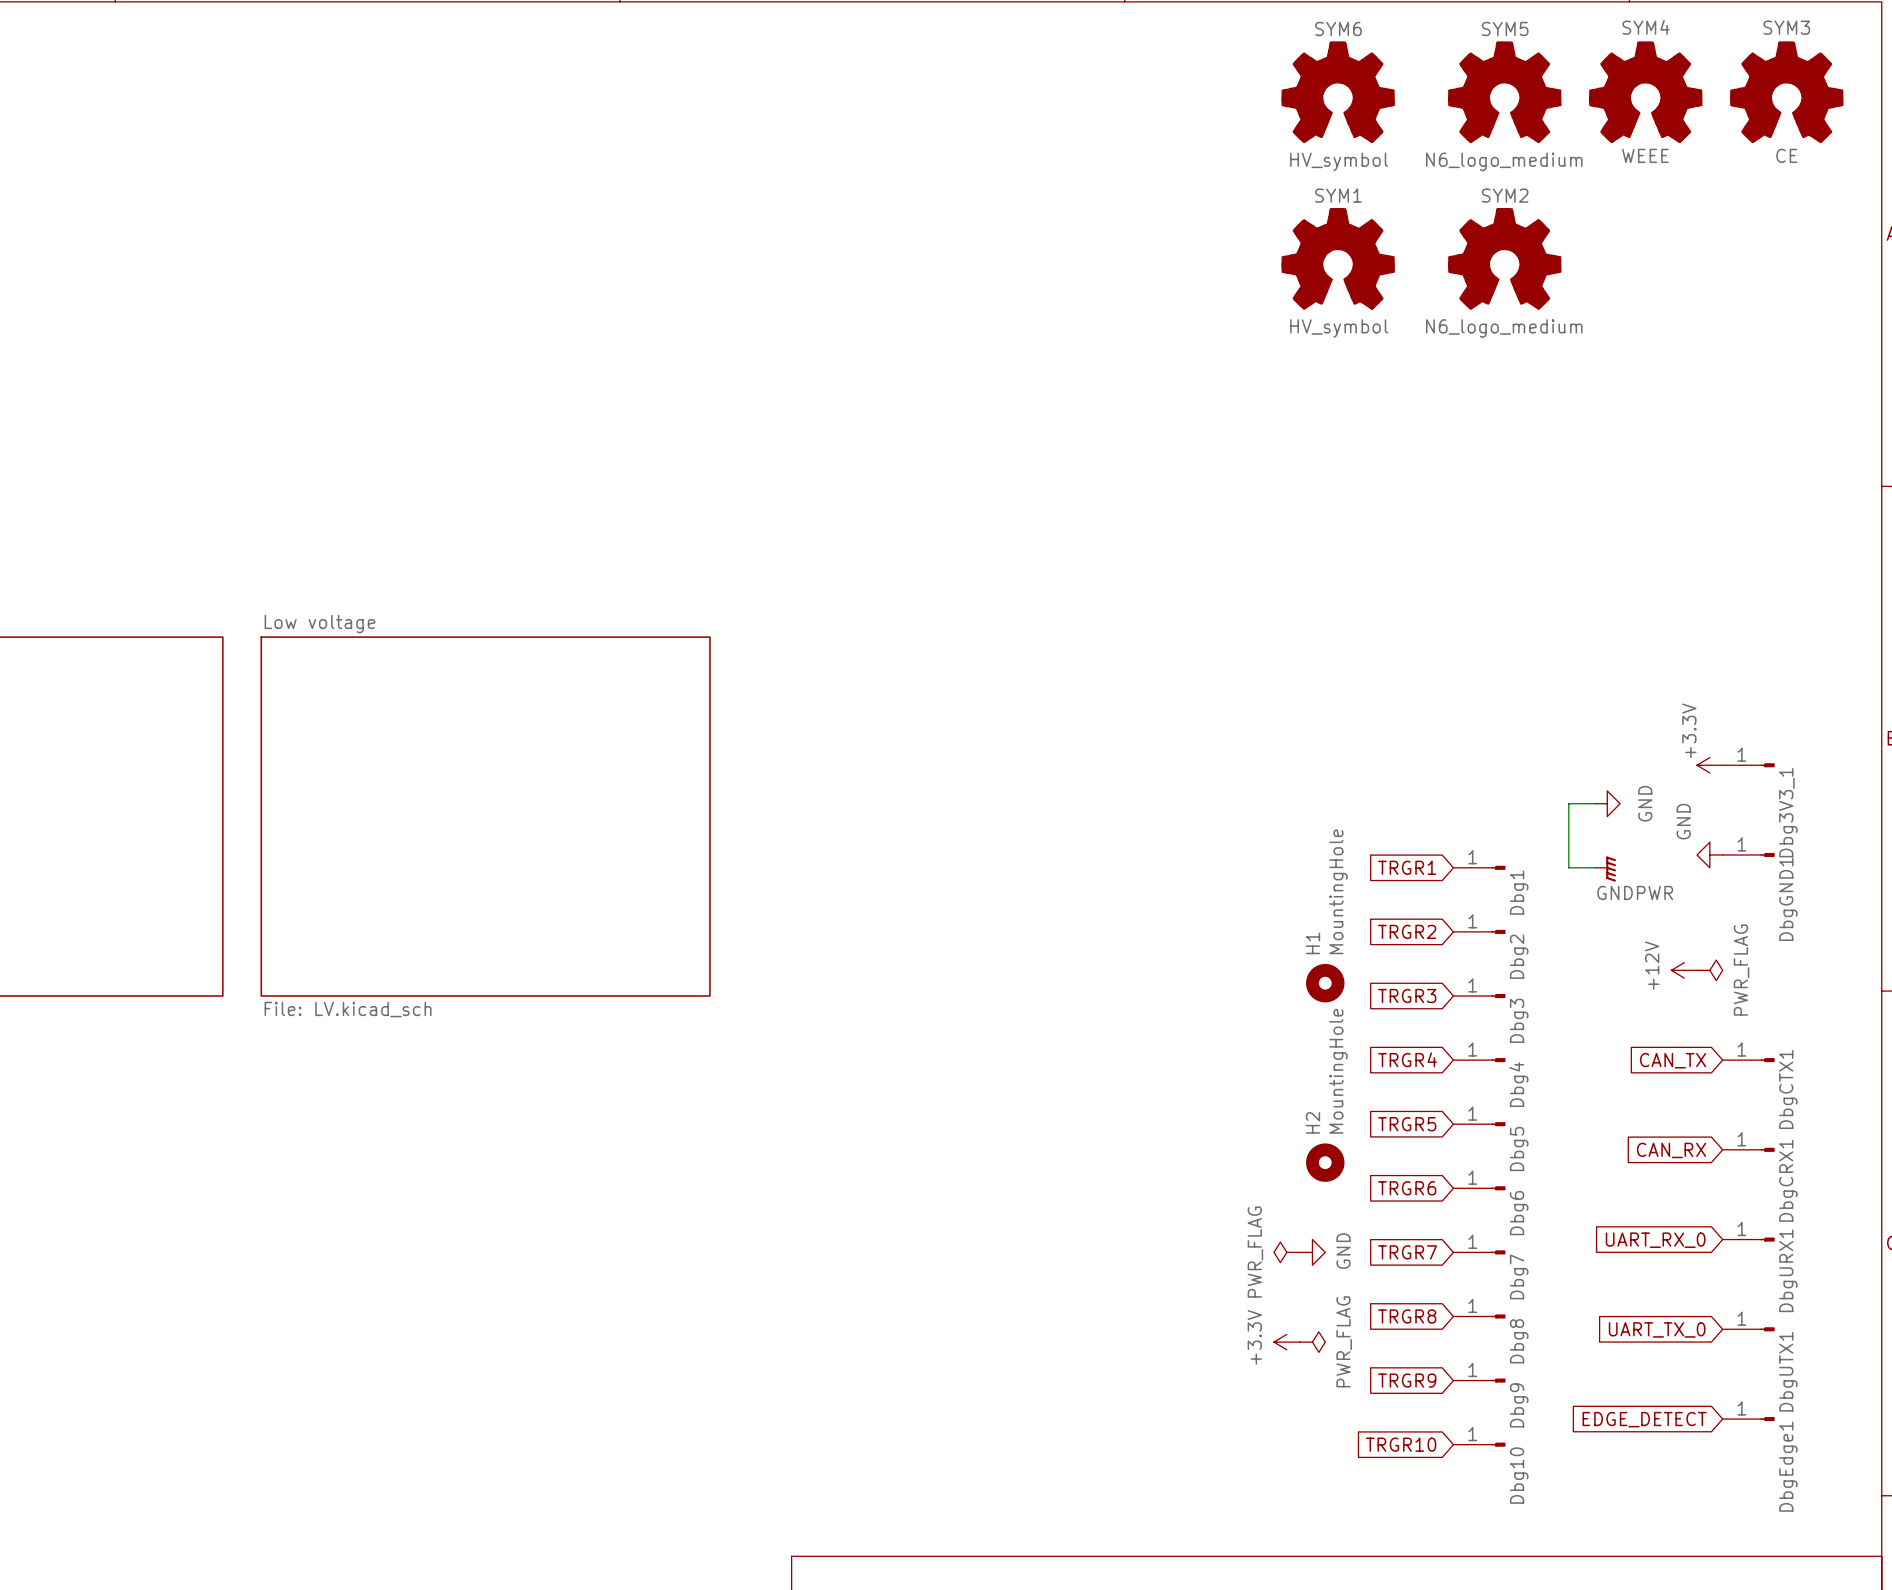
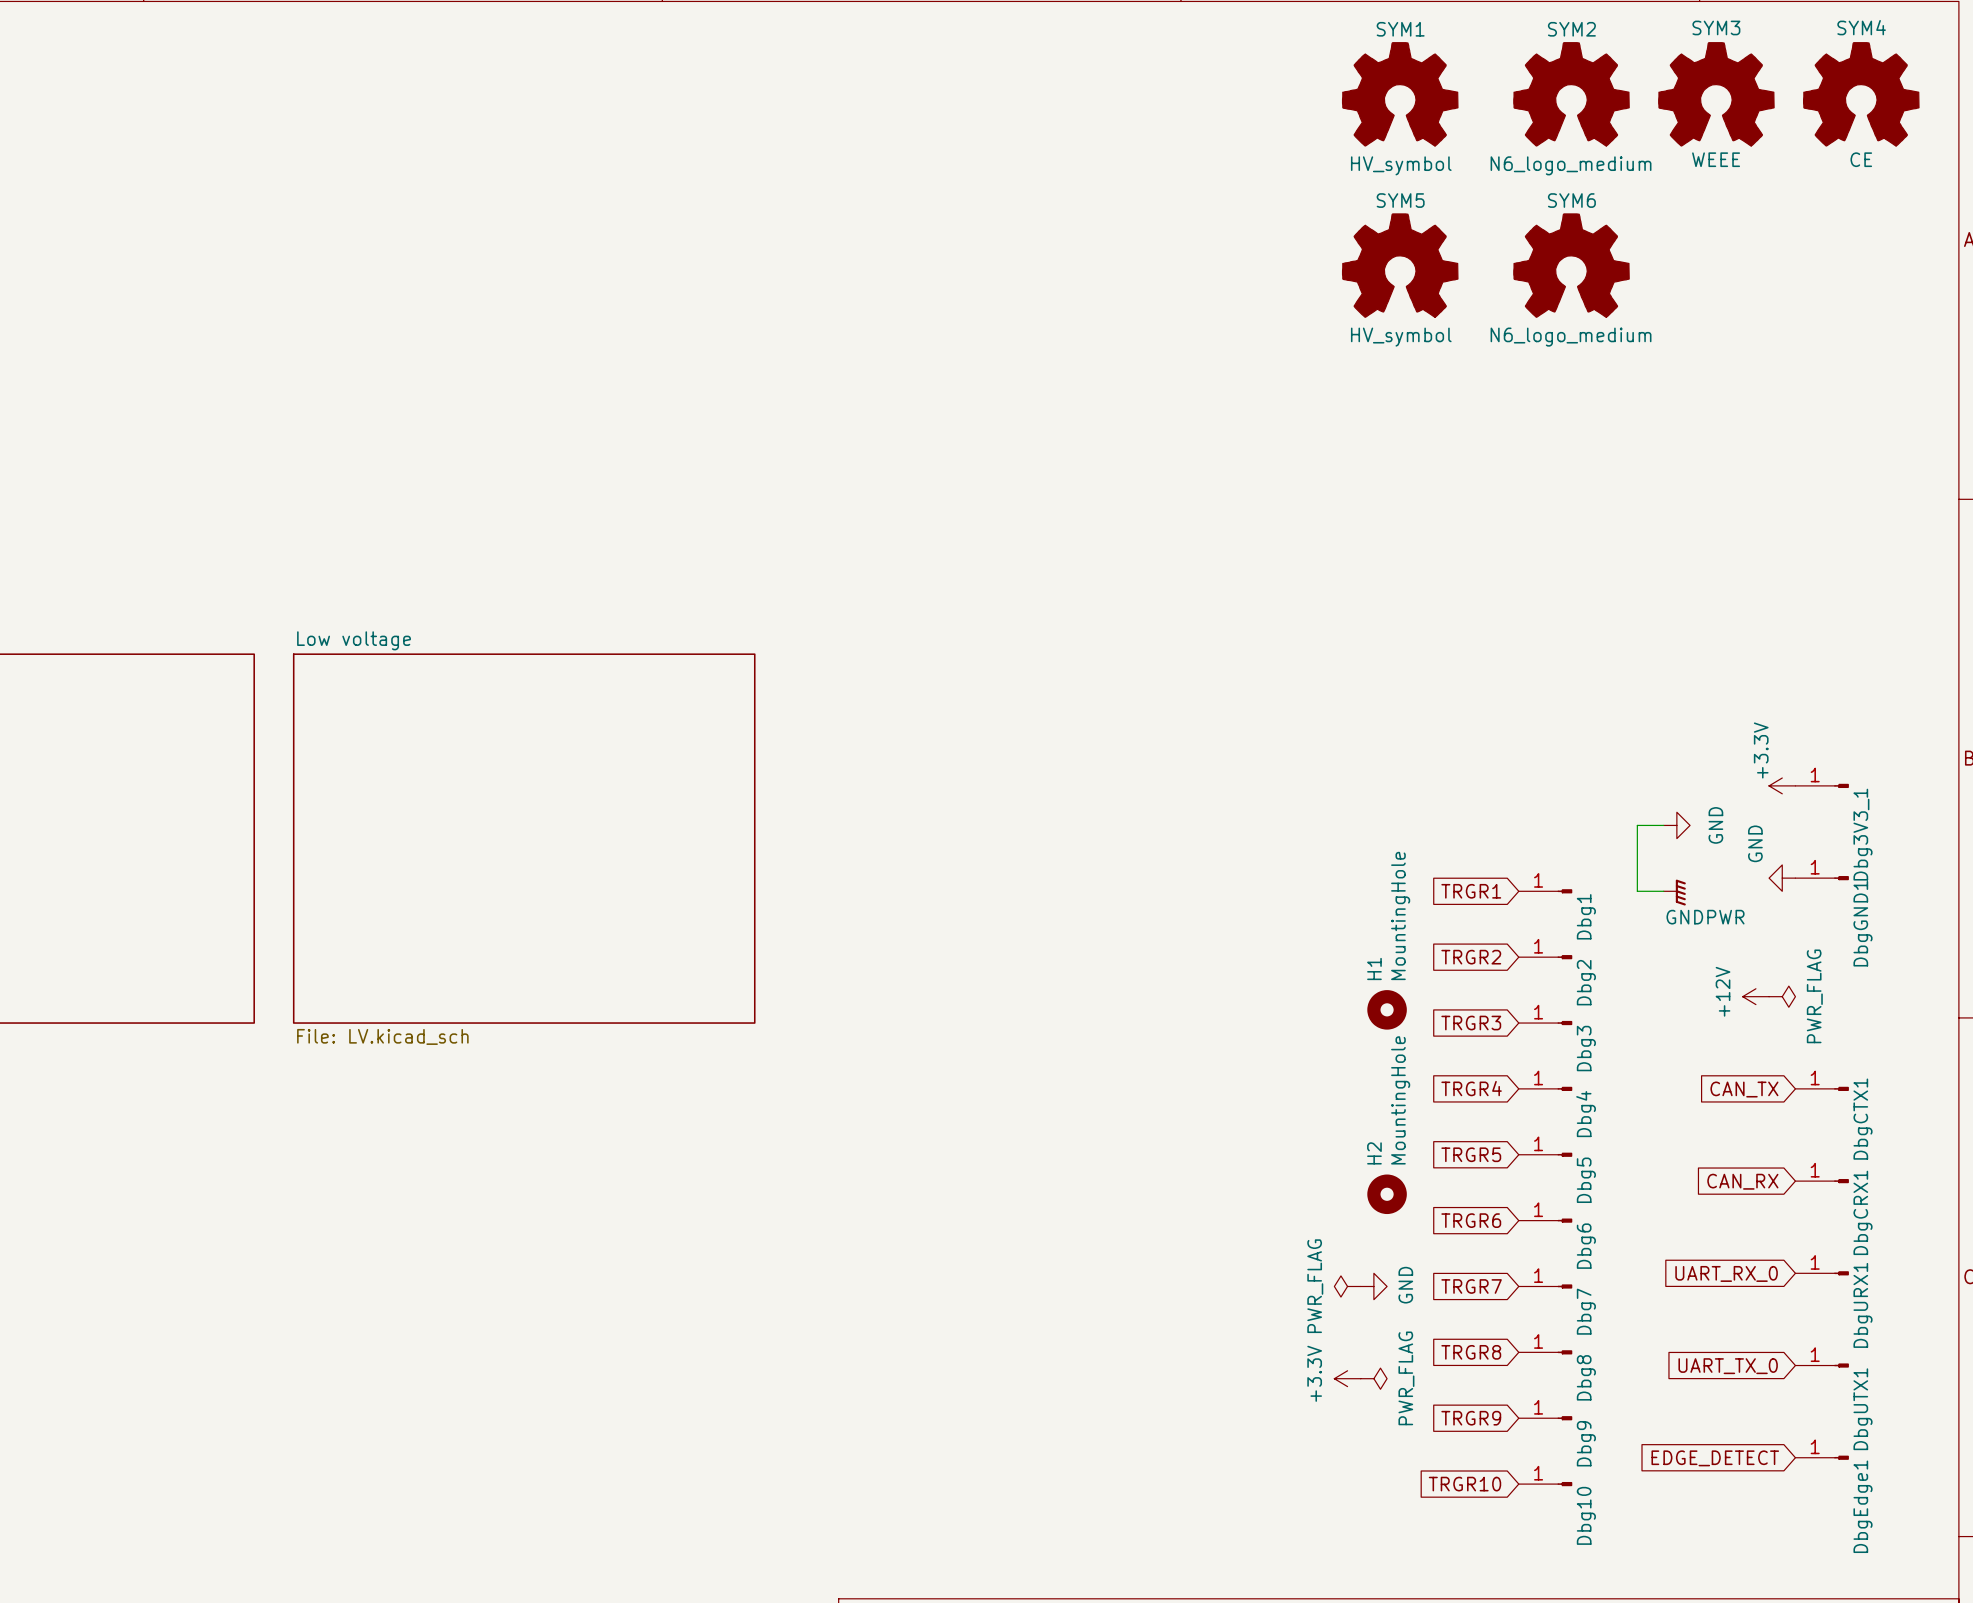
SYM4 name: SYM4 (1646, 27) -> SYM3 (1716, 27)
SYM3 name: SYM3 (1786, 27) -> SYM4 (1861, 27)
SYM6 name: SYM6 (1338, 28) -> SYM1 (1400, 29)
SYM5 name: SYM5 (1505, 28) -> SYM2 (1571, 29)
SYM1 name: SYM1 (1338, 195) -> SYM5 (1400, 200)
SYM2 name: SYM2 (1505, 195) -> SYM6 (1571, 200)

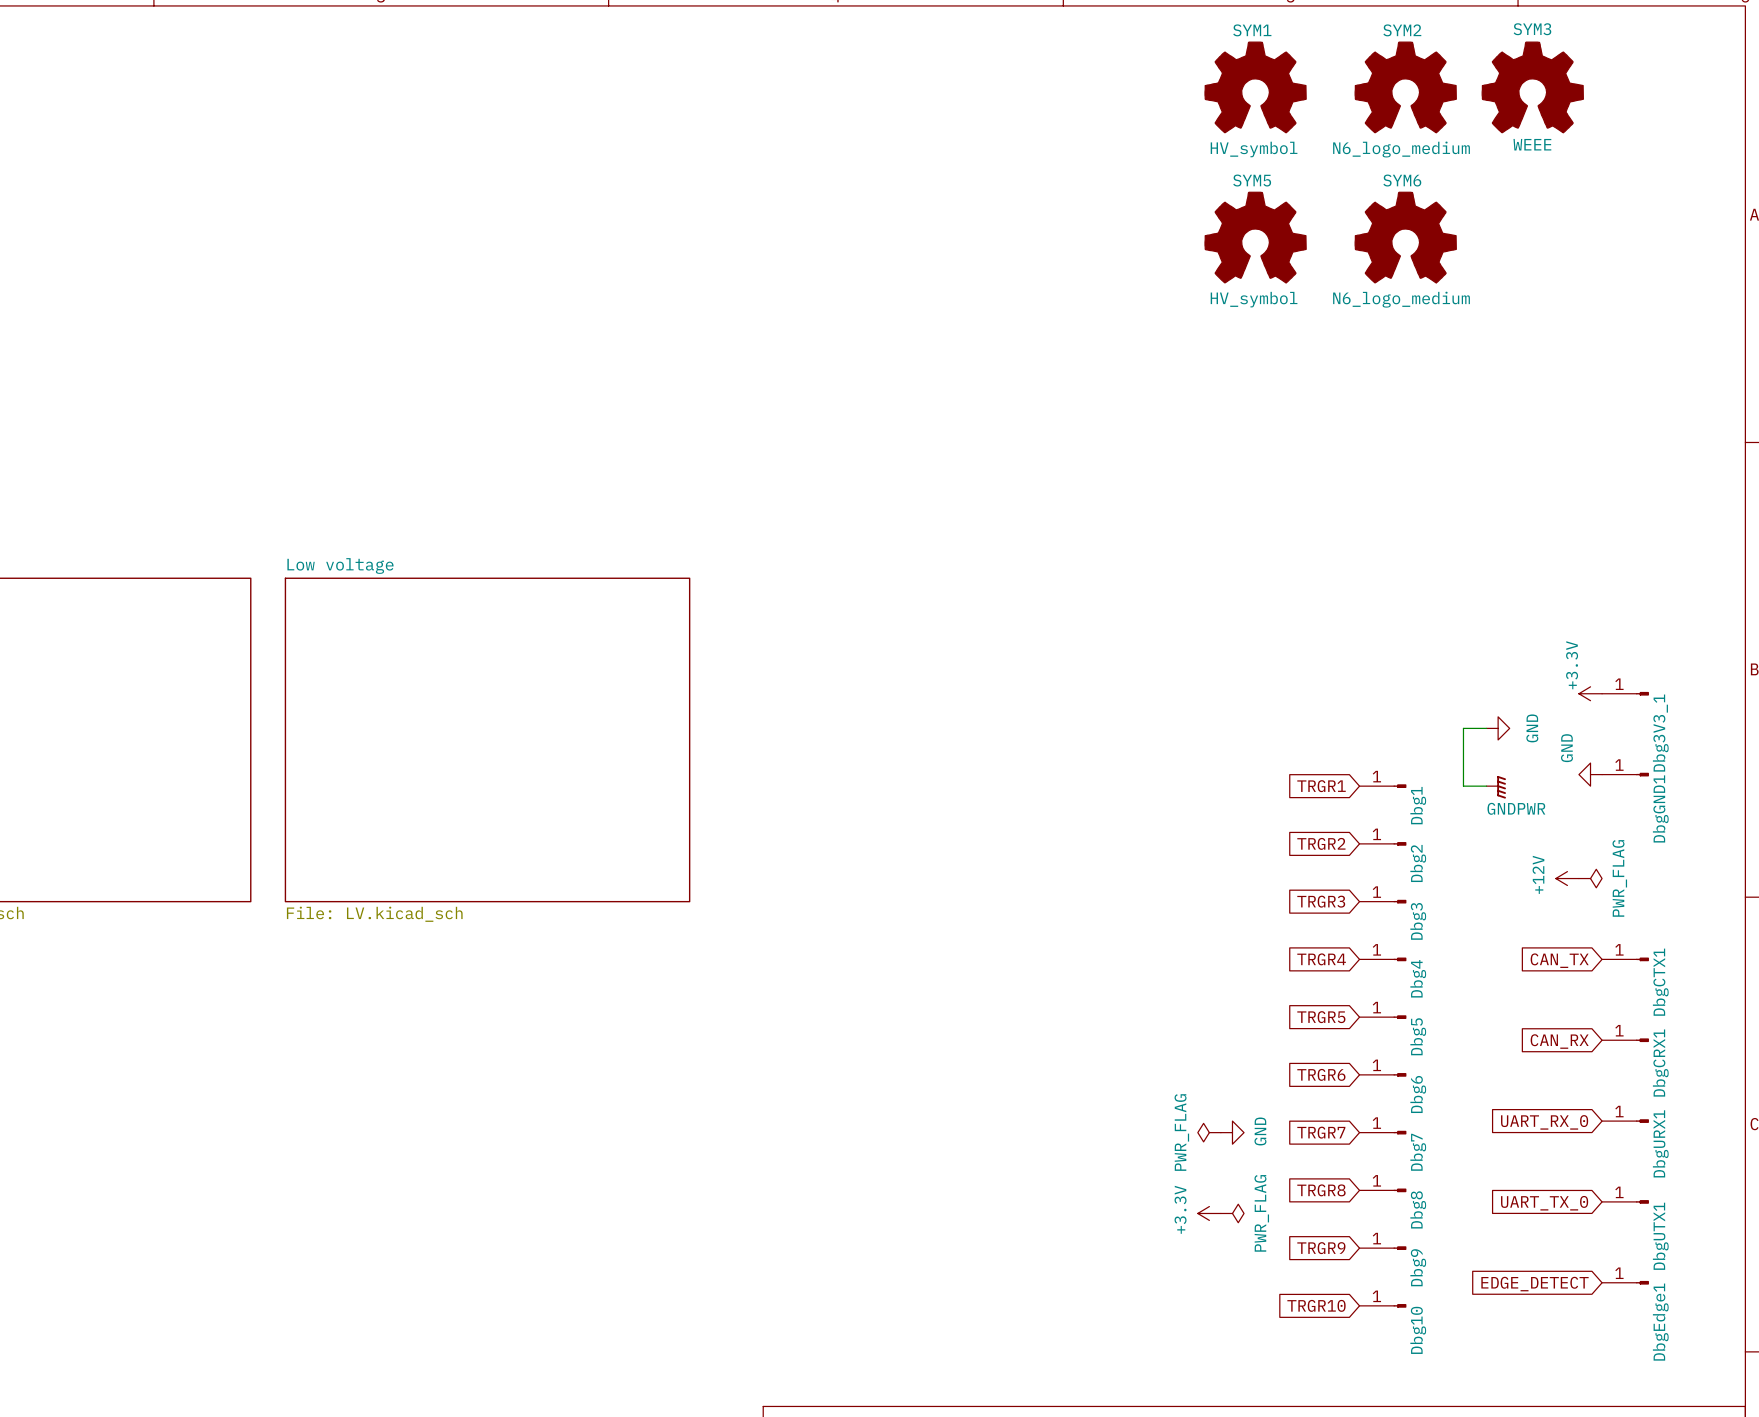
SYM4: CE (1861, 94) -> none
H1: MountingHole (1387, 1009) -> none
H2: MountingHole (1387, 1194) -> none

